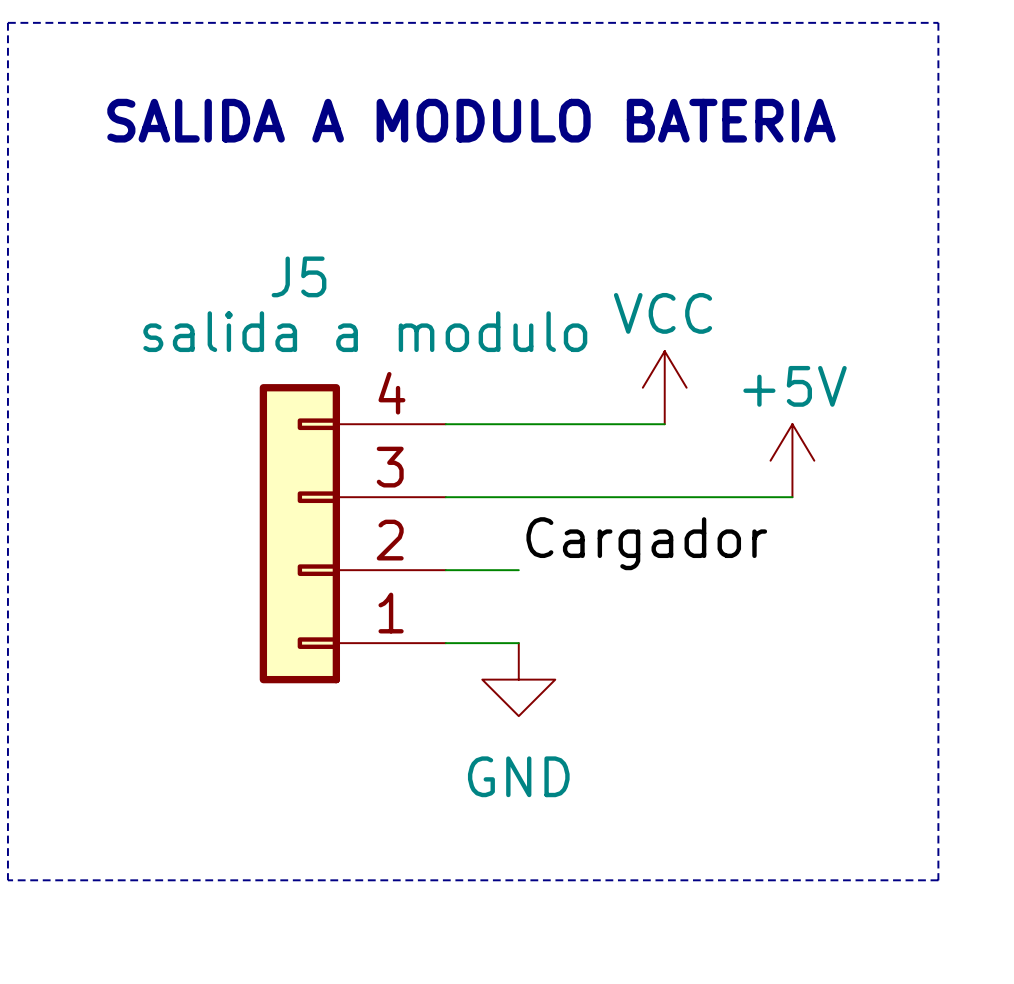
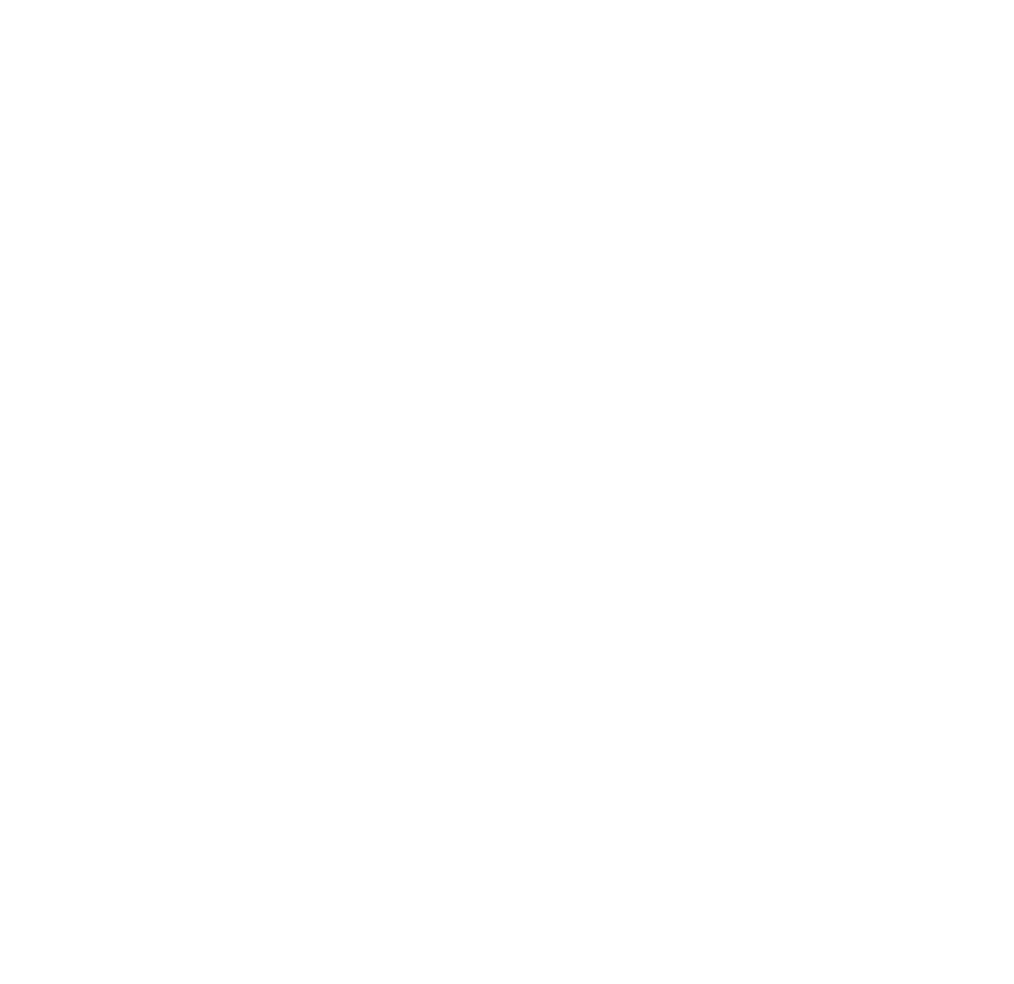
line: (7, 22) (7, 880) (938, 880) (938, 22) (7, 22) -> none
text: SALIDA A MODULO BATERIA (471, 120) -> none
power symbol: VCC (664, 387) -> none
wire: (445, 424) (664, 424) -> none
power symbol: +5V (792, 460) -> none
wire: (445, 497) (792, 497) -> none
J5: salida a modulo (352, 533) -> none
label: Cargador (646, 543) -> none
wire: (445, 570) (518, 570) -> none
wire: (445, 643) (518, 643) -> none
power symbol: GND (518, 679) -> none

